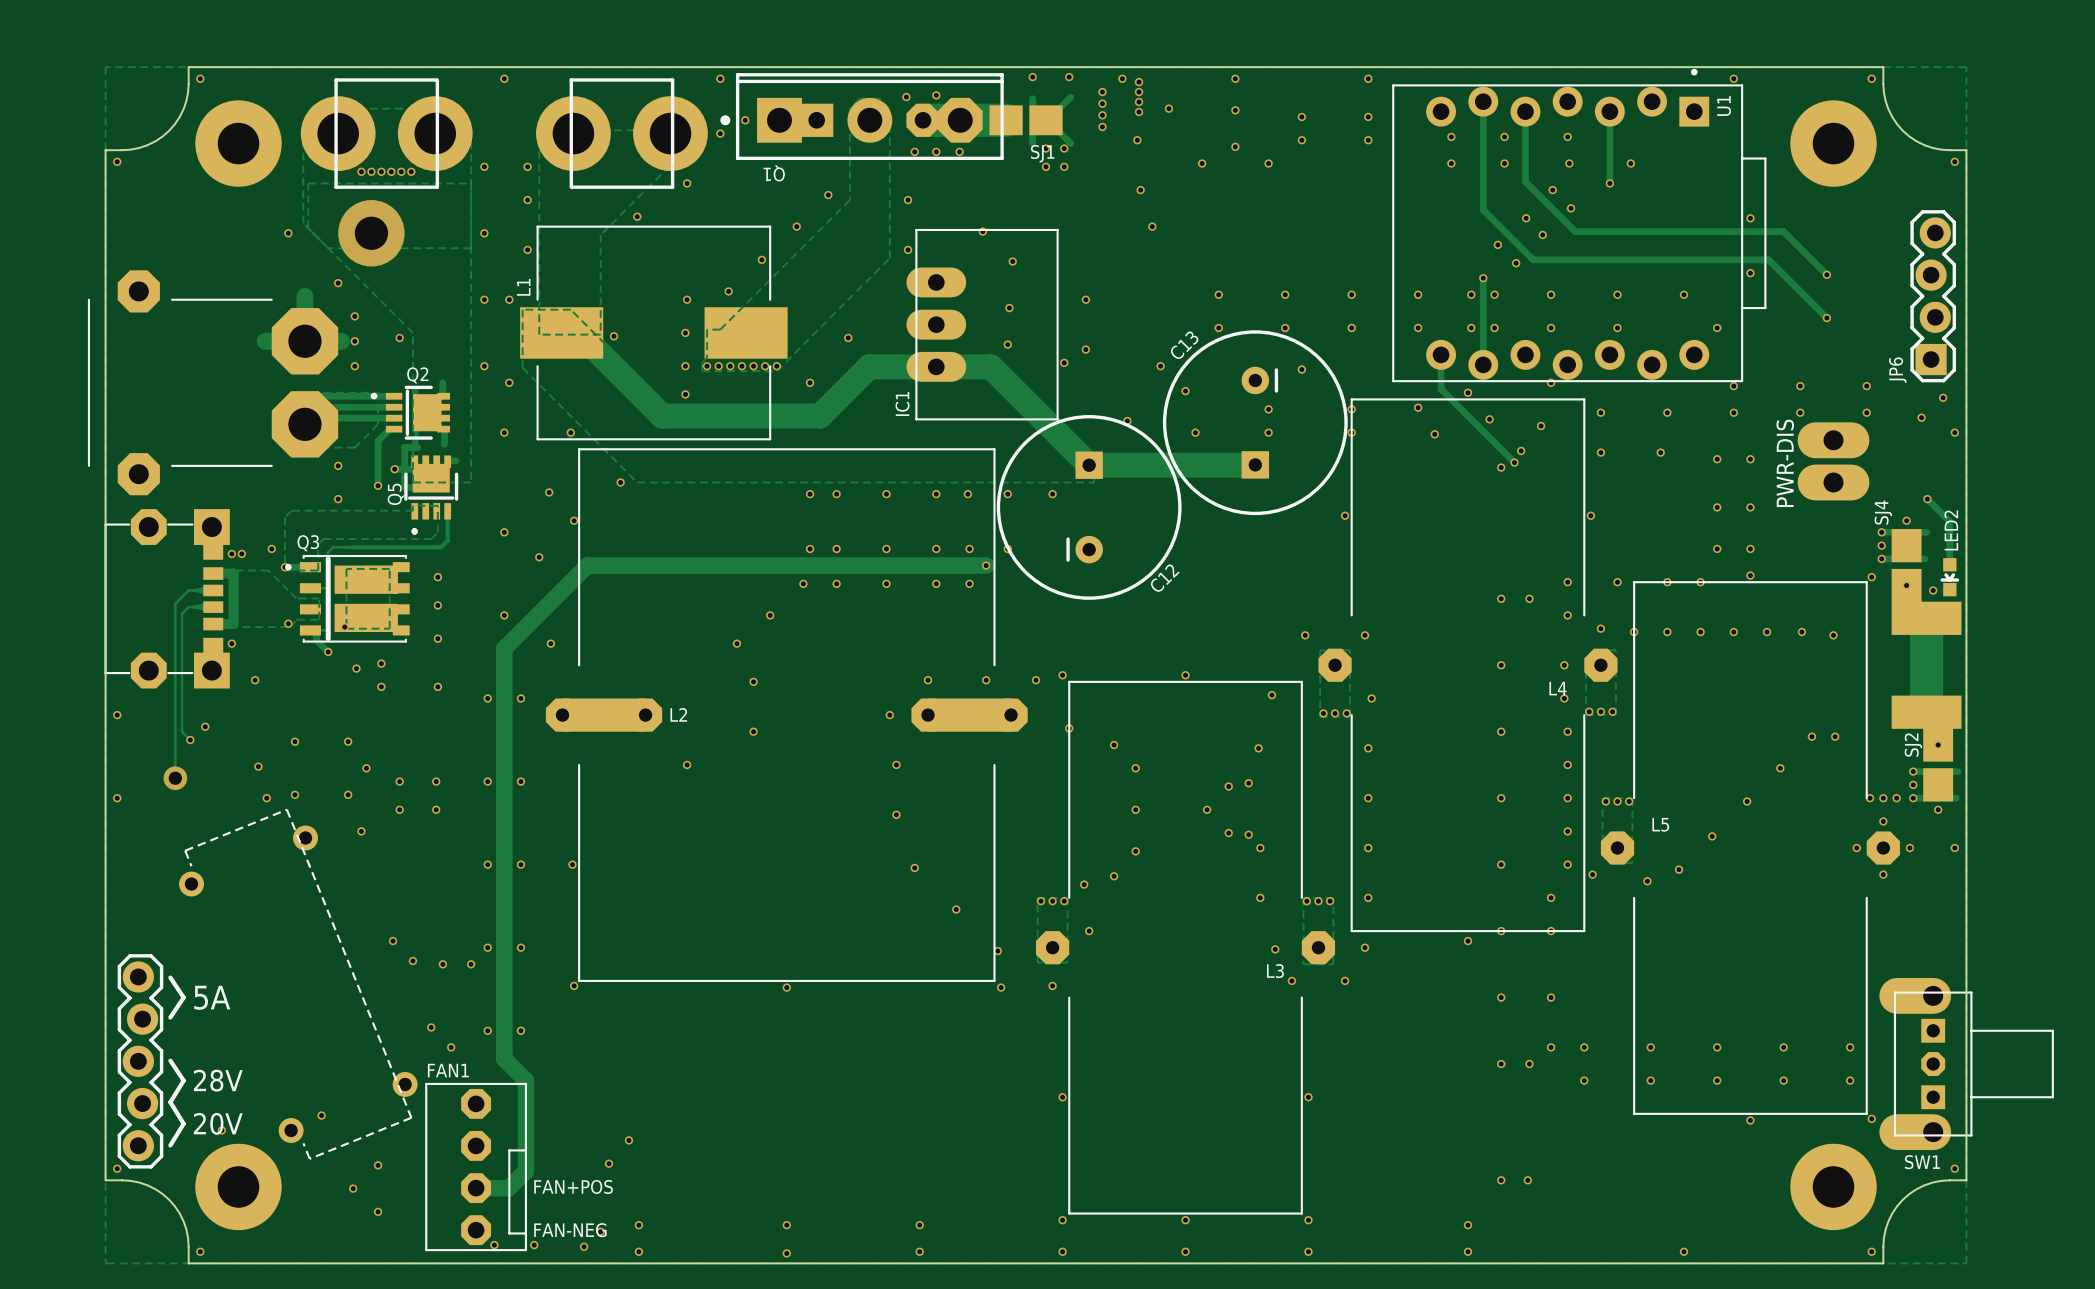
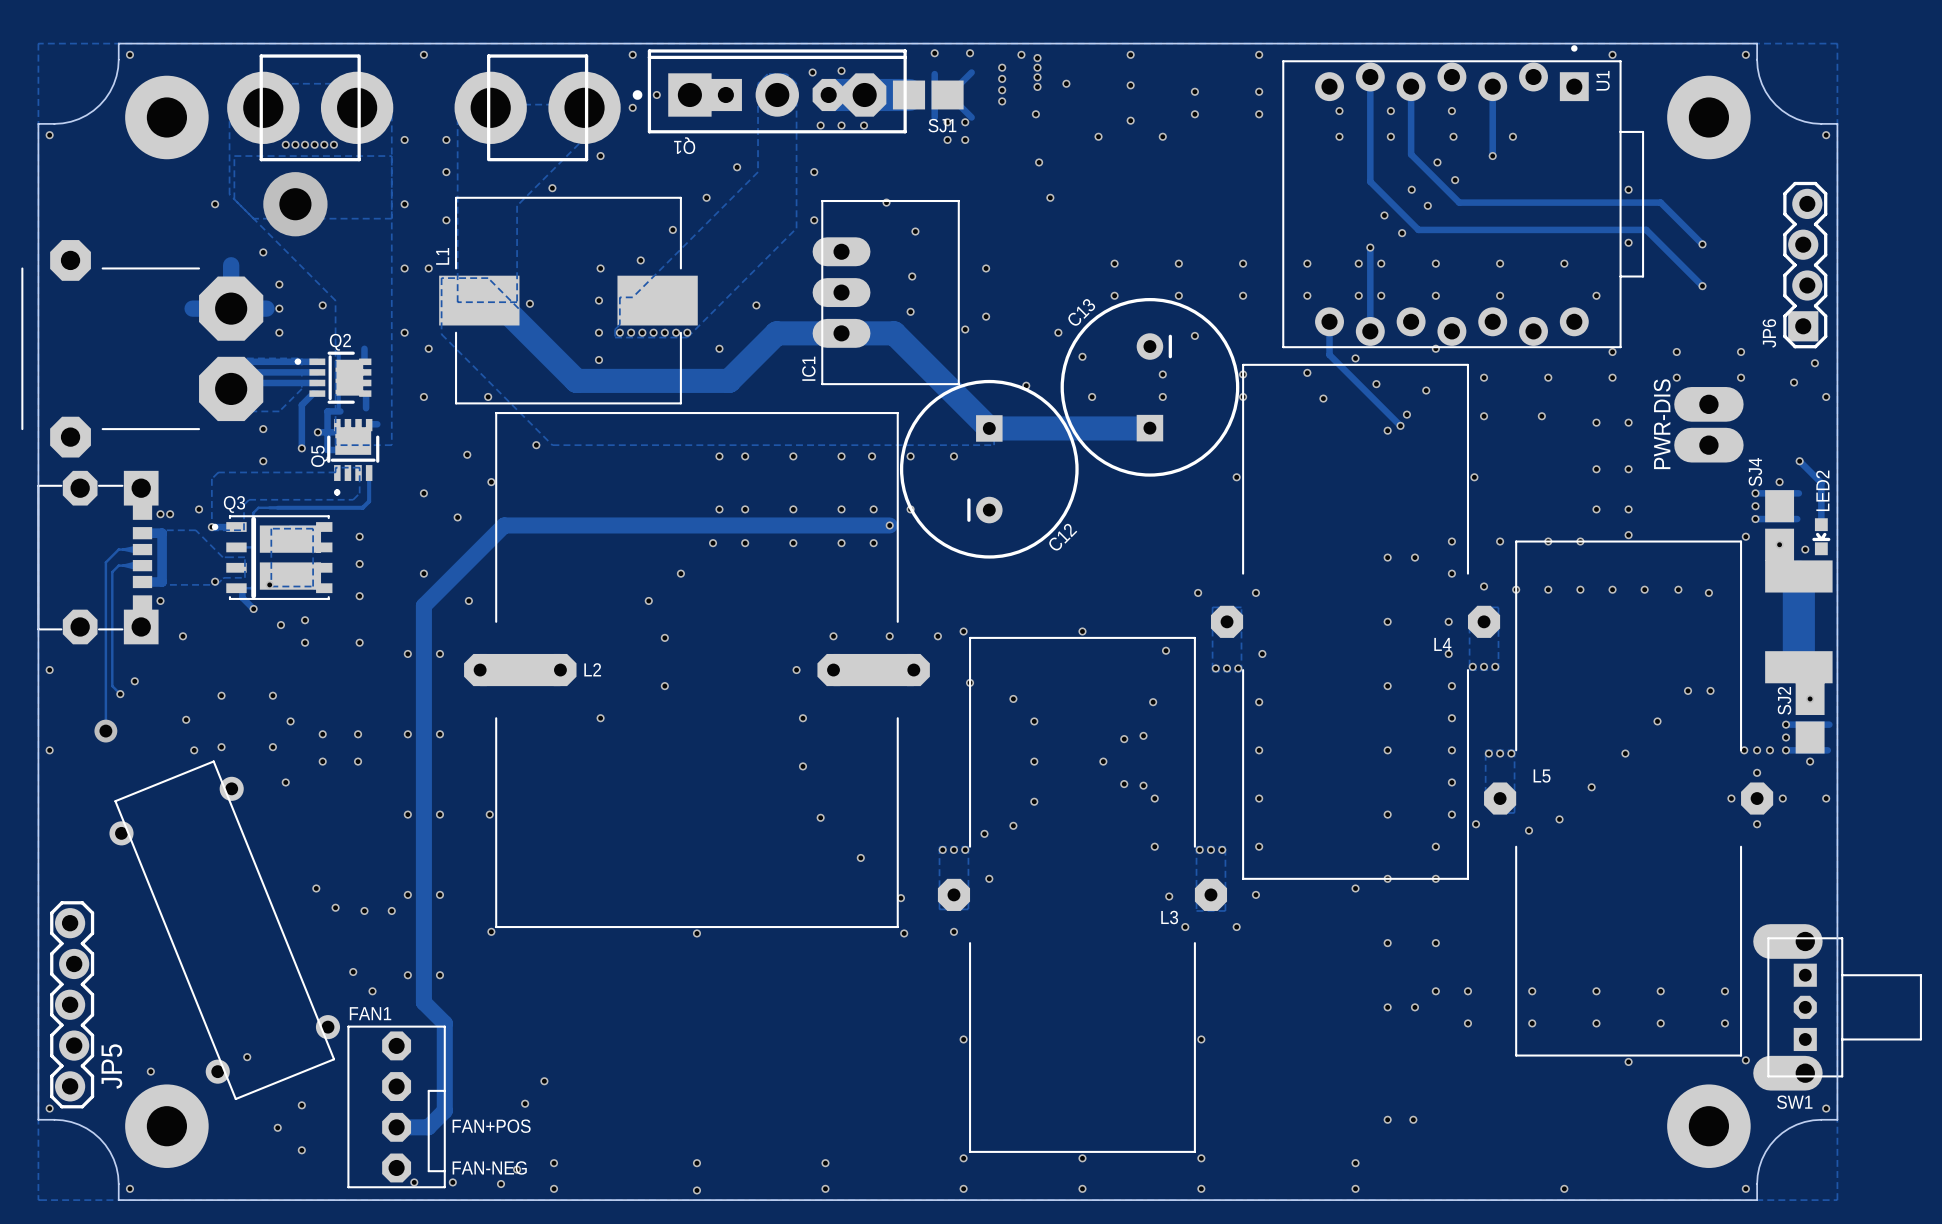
part footprint: [179, 808, 418, 1160] -> [109, 760, 341, 1101]
line: (170, 977) (183, 997) (170, 1017) -> none
text: 5A (212, 997) -> none
line: (170, 1060) (183, 1080) (170, 1102) (183, 1123) (170, 1145) -> none
text: 28V (218, 1080) -> none
JP5 name: none -> JP5 (111, 1066)
text: 20V (218, 1123) -> none

